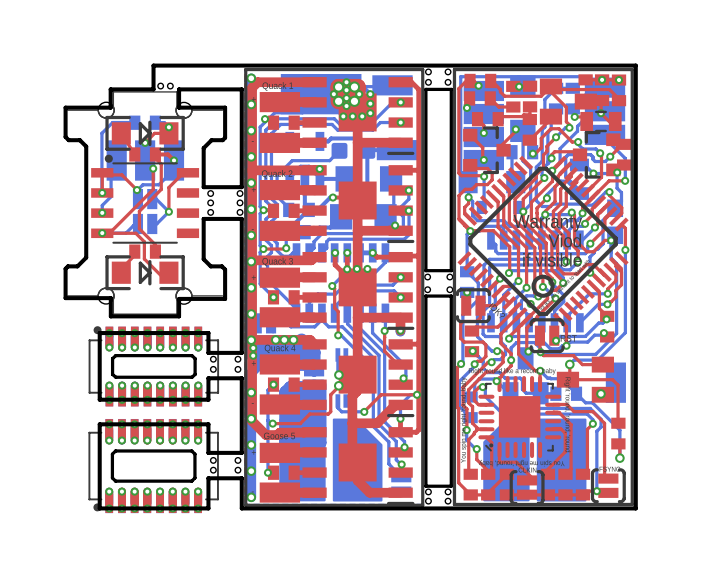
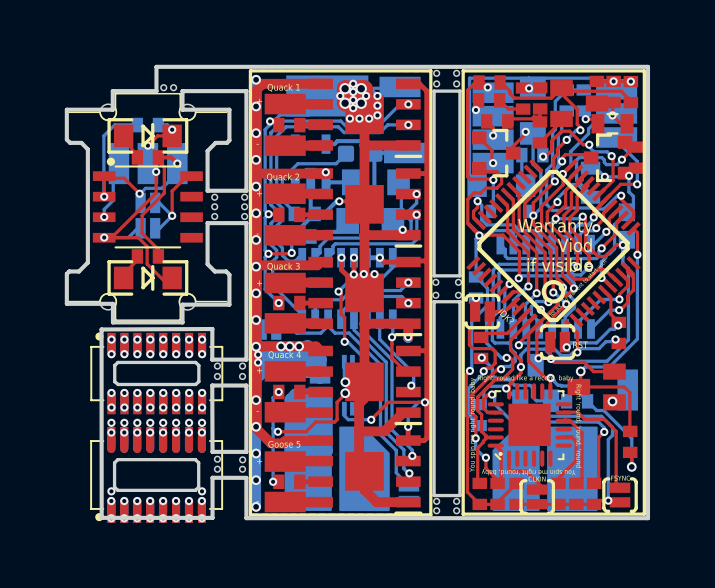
board edge: (241, 352) (208, 352) (208, 333) (99, 333) (99, 399) (208, 399) (208, 378) (241, 378) (241, 452) (208, 452) (208, 424) (99, 424) (99, 508) (208, 508) (208, 478) (241, 478) (241, 508) -> (246, 359) (212, 359) (212, 329) (101, 329) (101, 517) (212, 517) (212, 477) (246, 477) (246, 518)
board edge: none -> (212, 385) (212, 451) (246, 451) (246, 385) (212, 385)
via: none -> (111, 422)
via: none -> (124, 422)
via: none -> (137, 422)
via: none -> (150, 422)
via: none -> (163, 422)
via: none -> (176, 422)
via: none -> (189, 422)
via: none -> (202, 422)
via: (109, 440) -> none
via: (121, 440) -> none
via: (134, 440) -> none
via: (147, 440) -> none
via: (160, 440) -> none
via: (172, 440) -> none
via: (185, 440) -> none
via: (198, 440) -> none
hole: none -> (217, 459)
hole: none -> (242, 459)
hole: (213, 470) -> none
hole: (237, 470) -> none
via: none -> (111, 491)
via: none -> (202, 491)

